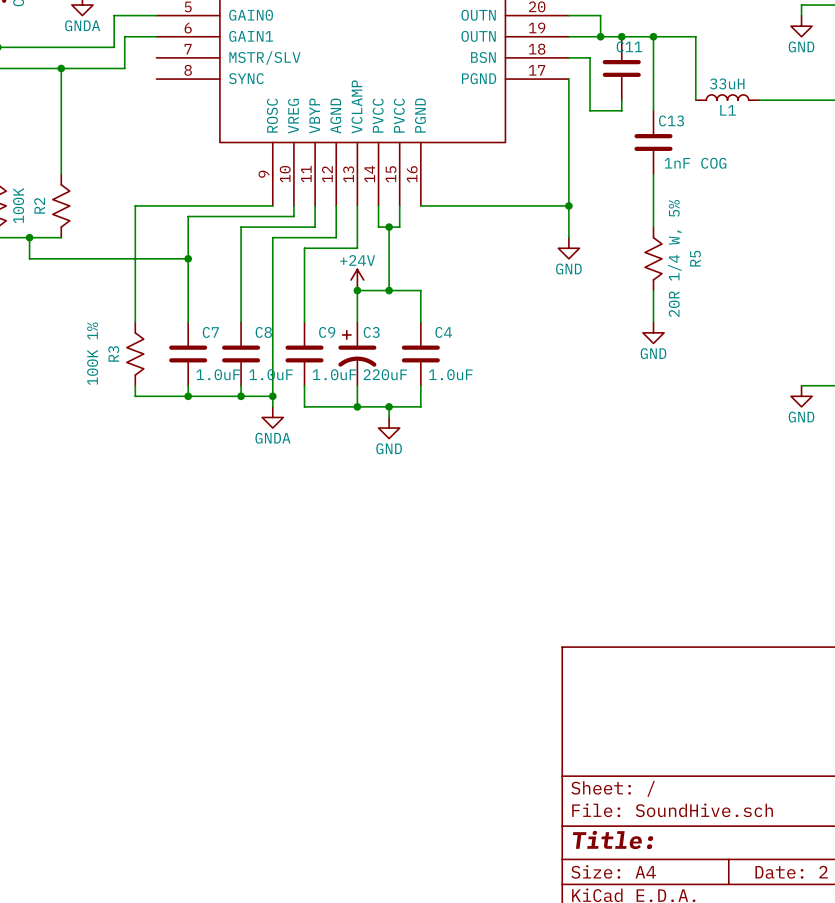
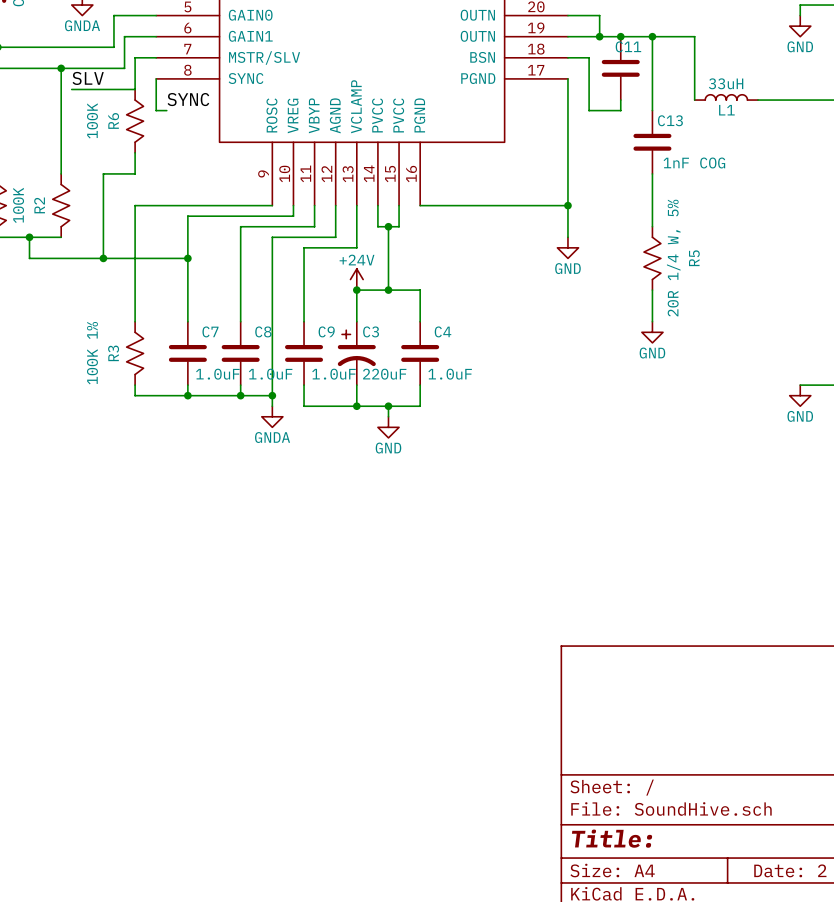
wire: none -> (156, 57) (135, 57) (135, 89) (71, 89)
label: none -> SLV (88, 78)
wire: none -> (156, 78) (156, 110) (166, 110)
label: none -> SYNC (188, 99)
R6: none -> 100K (135, 121)
wire: none -> (135, 152) (135, 173) (103, 173) (103, 258)
junction: none -> (103, 258)

